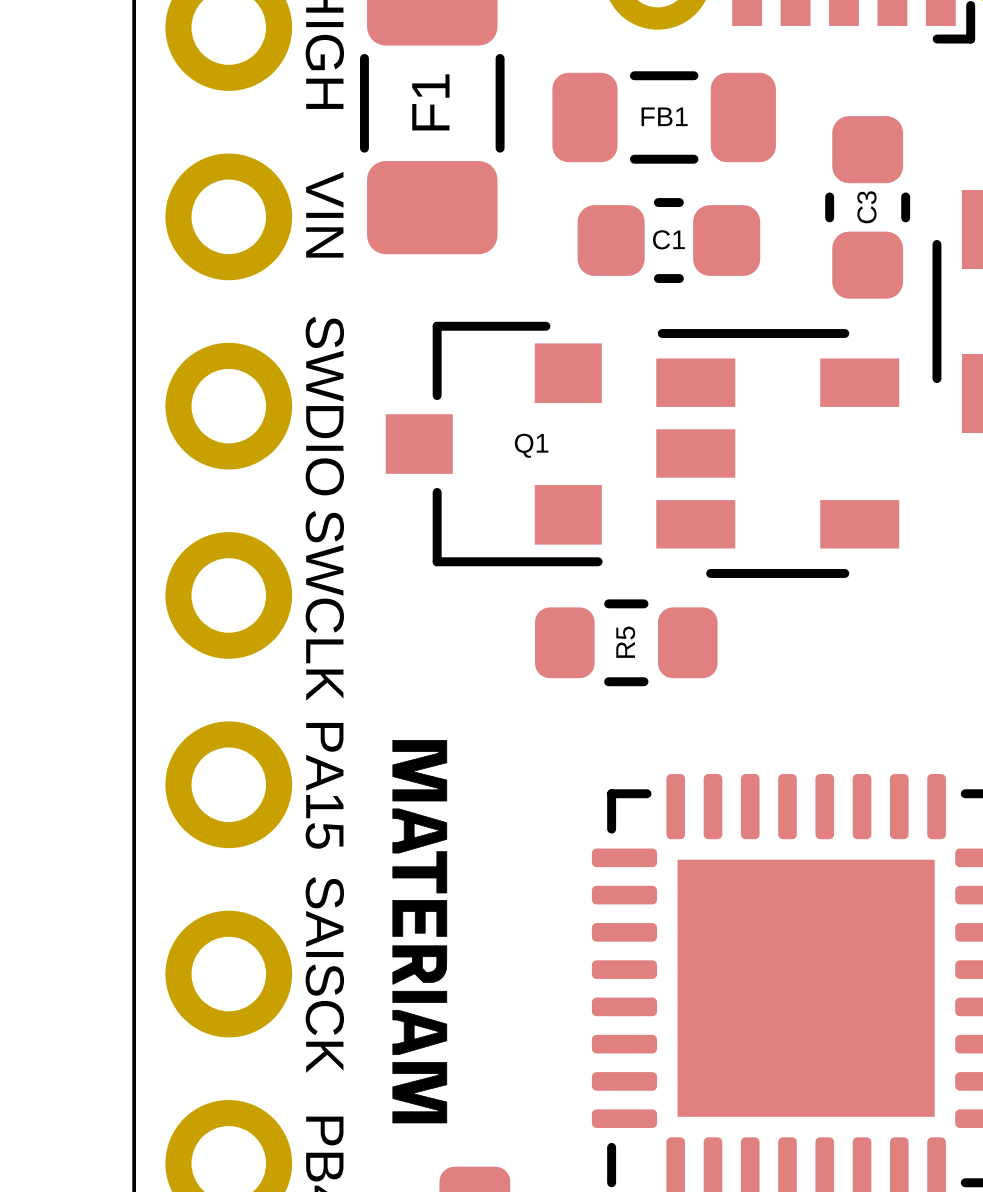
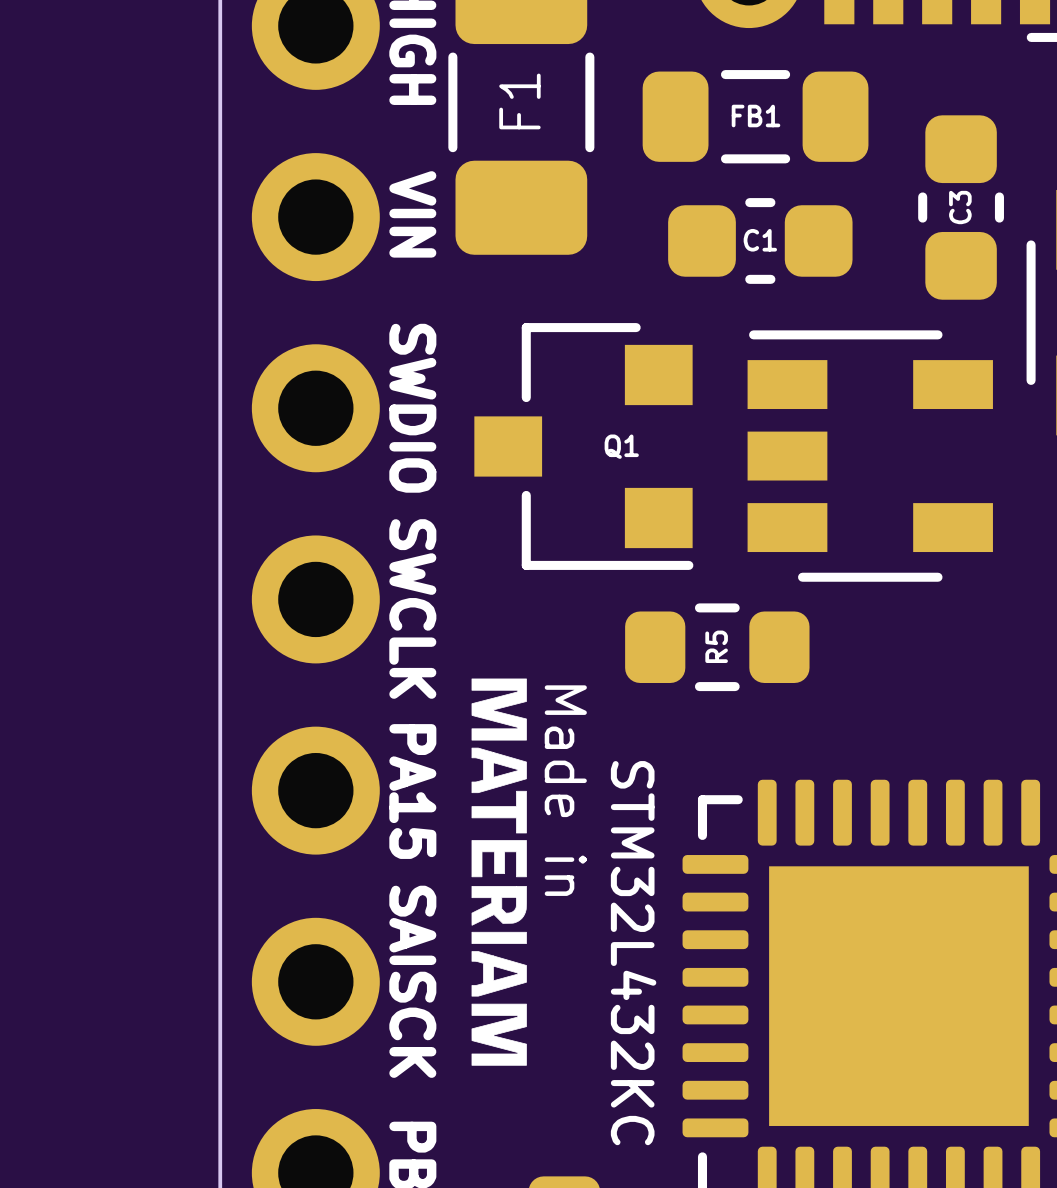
text: none -> Made in (565, 790)
drawing position: (419, 931) -> (499, 872)
text: none -> STM32L432KC (633, 953)

